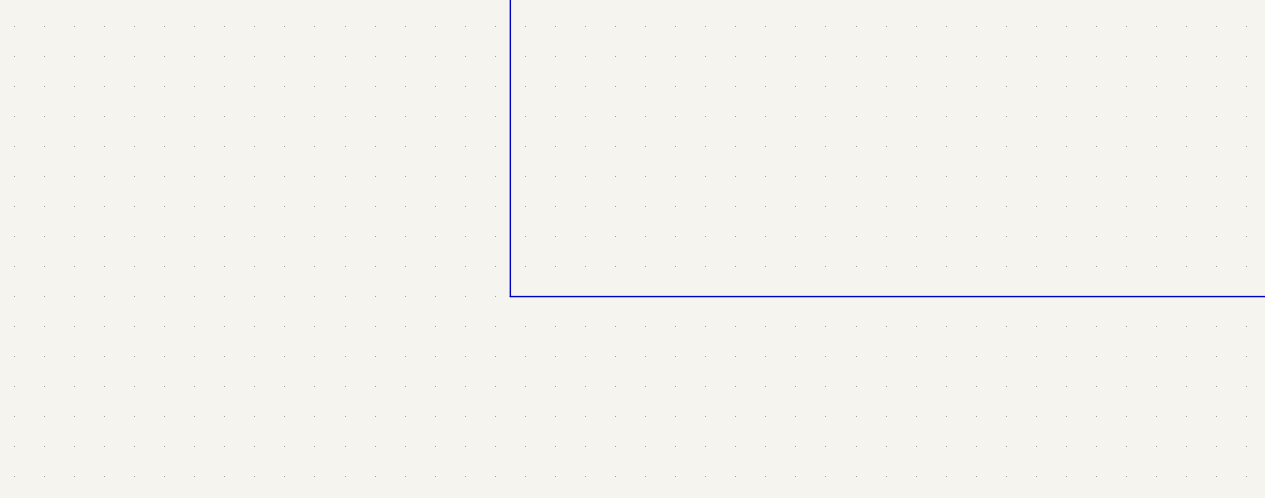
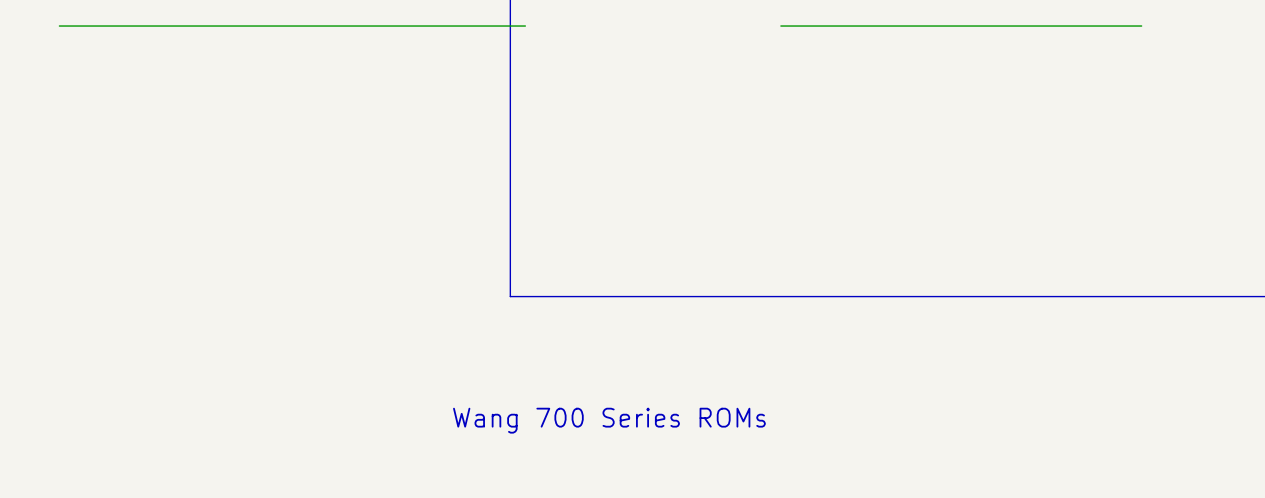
wire: none -> (59, 26) (525, 26)
wire: none -> (780, 26) (1141, 26)
text: none -> Wang 700 Series ROMs (609, 420)

